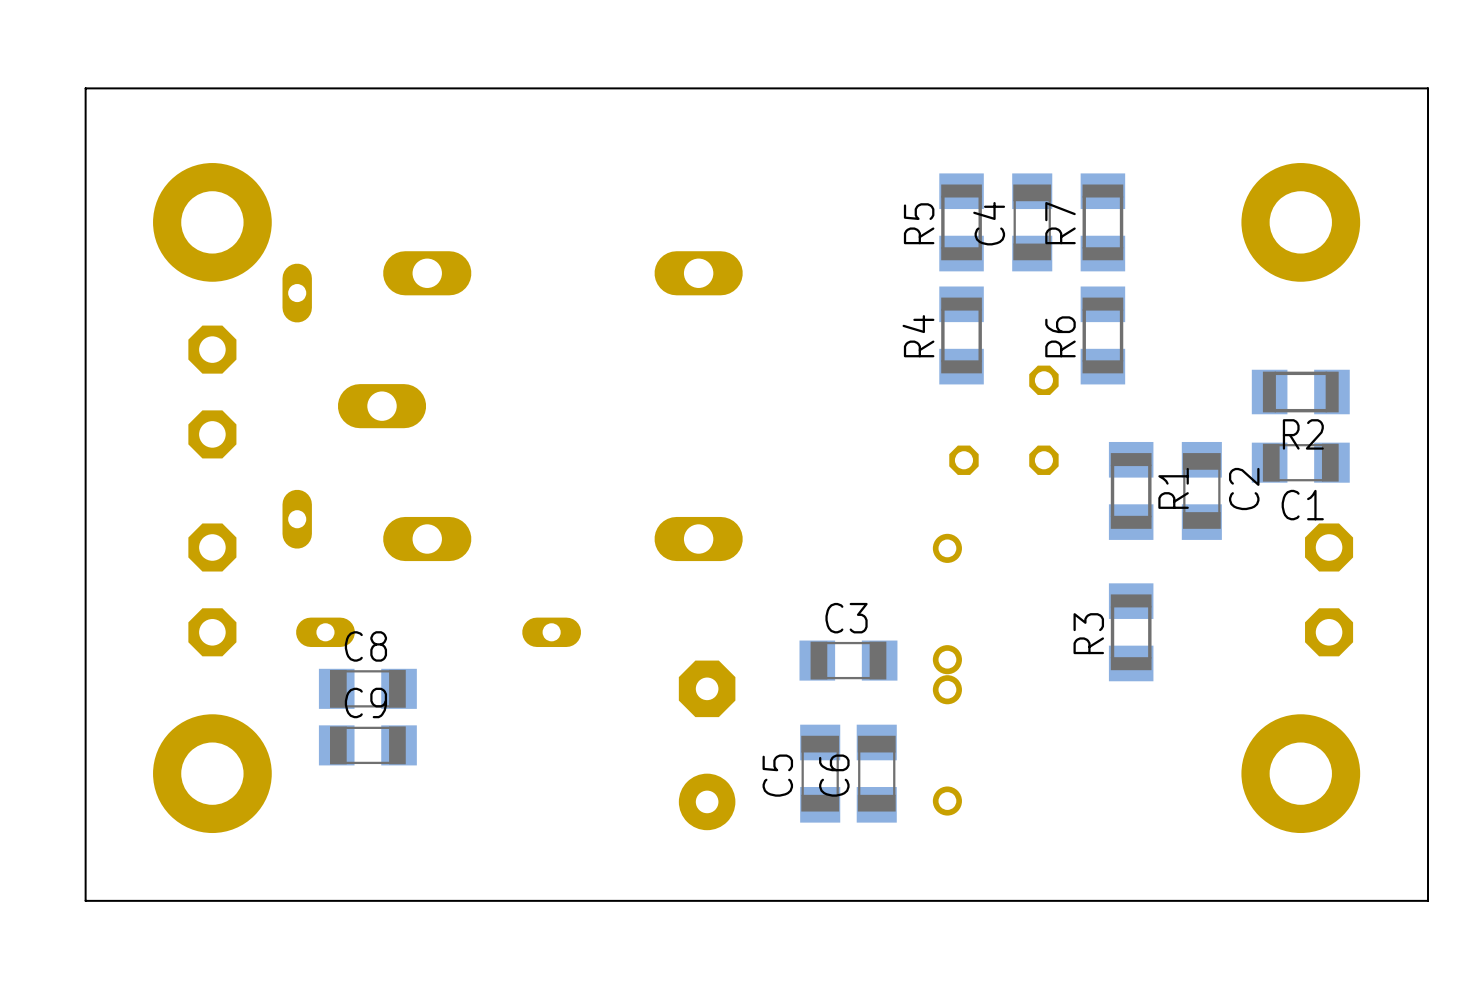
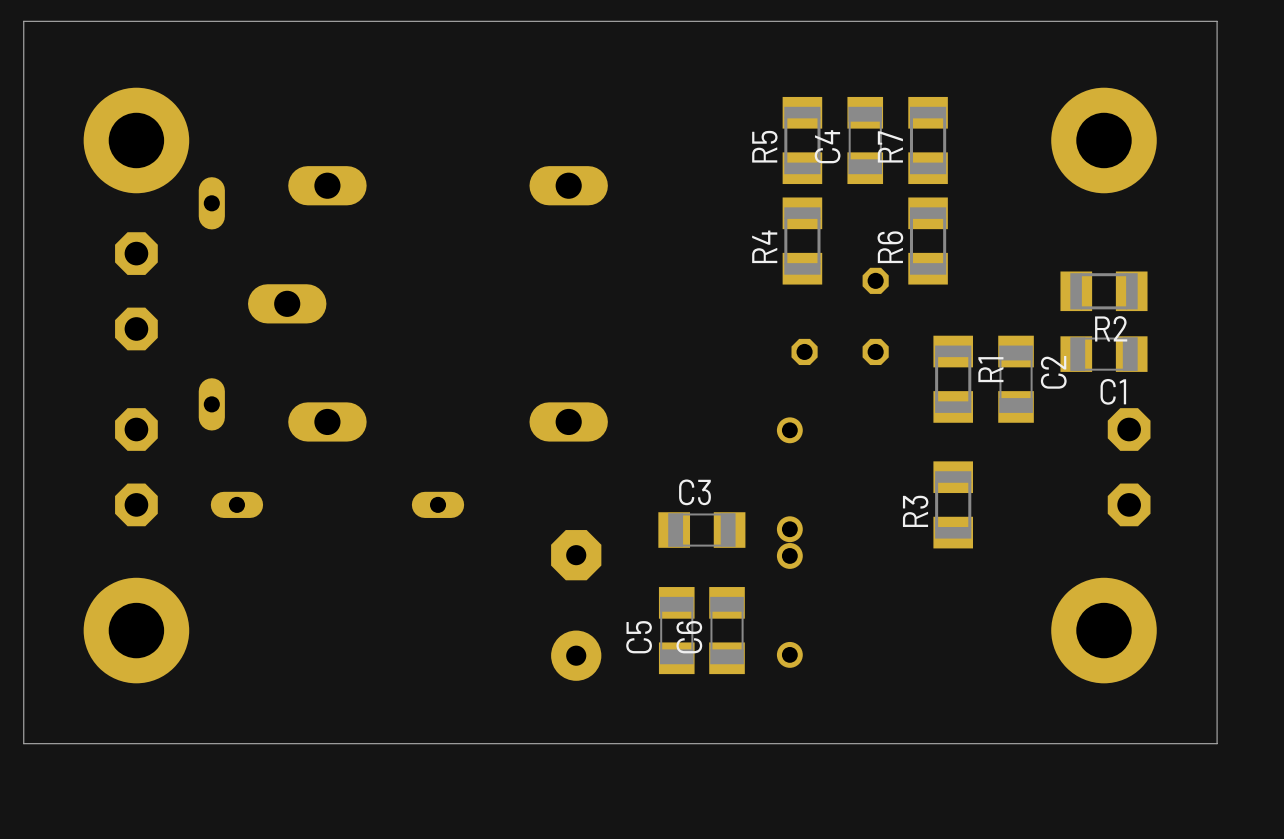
C8: (367, 688) -> none
C9: (367, 745) -> none

